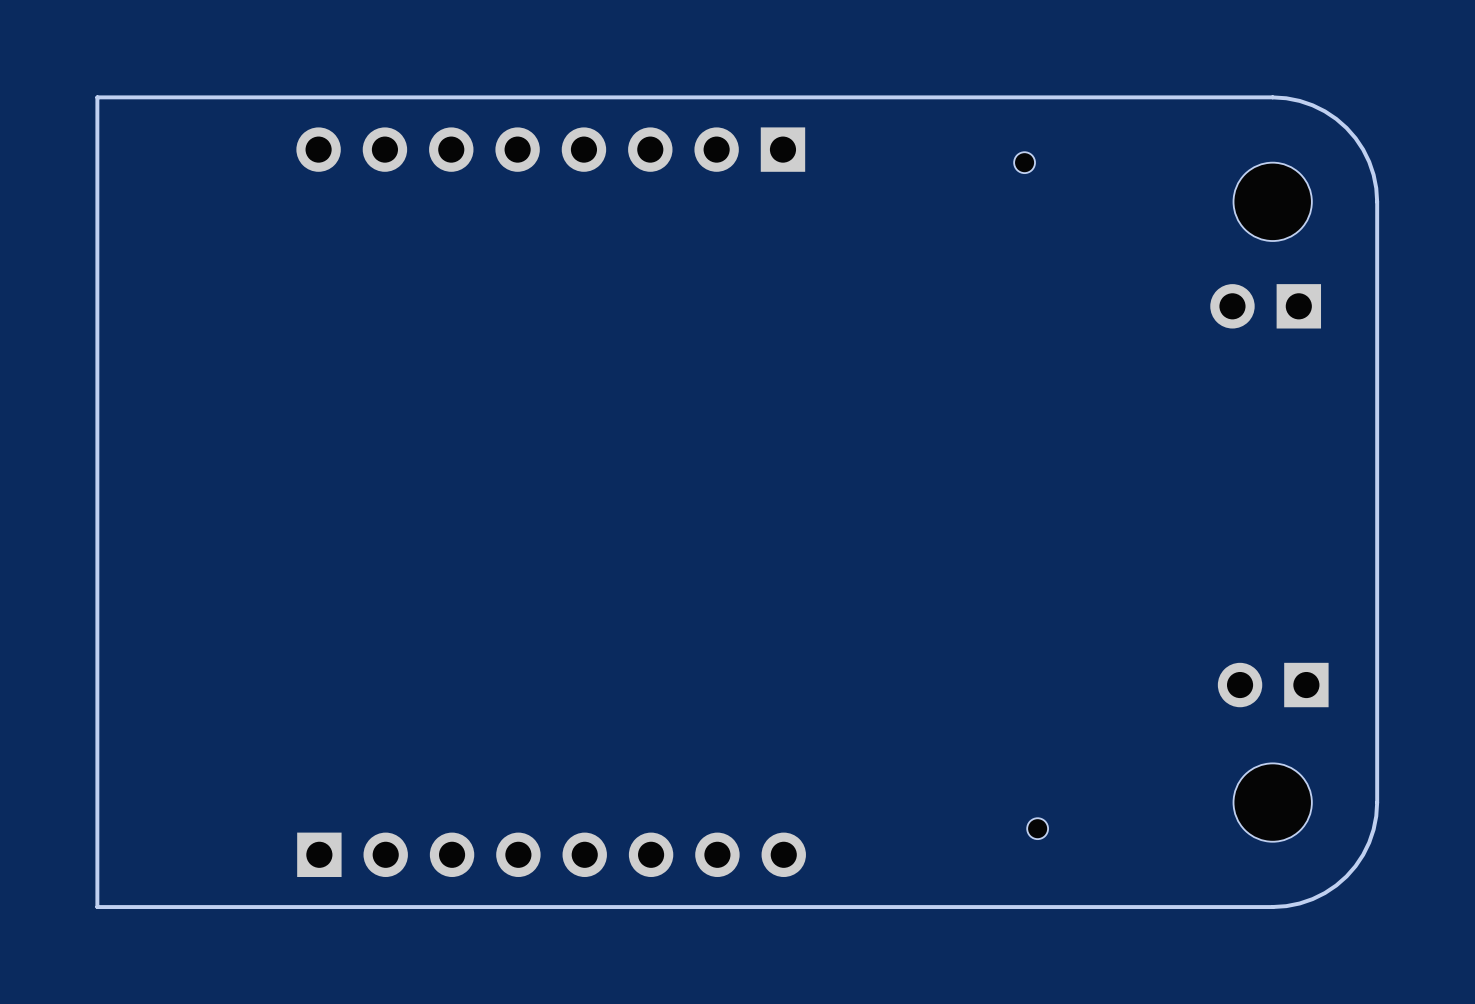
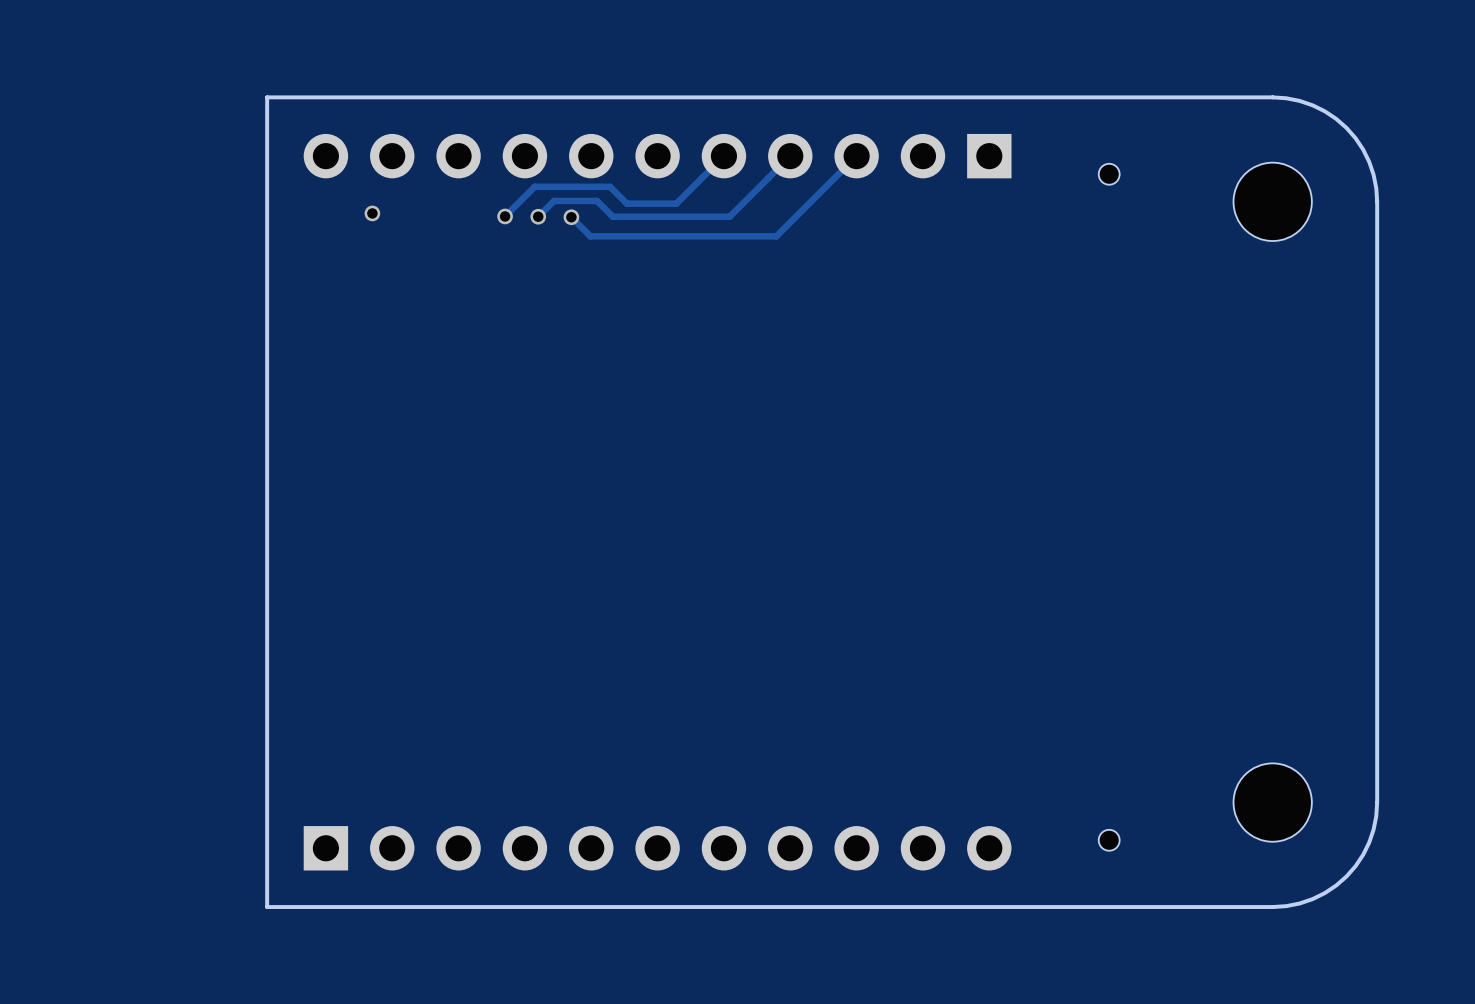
board edge: (267, 97) (97, 97) (97, 907) (267, 907) -> (267, 97) (267, 907)
part: (550, 149) -> none
part: none -> (657, 156)
track: none -> (723, 156) (676, 203) (626, 203) (610, 186) (534, 186) (505, 216)
track: none -> (790, 156) (729, 216) (612, 216) (597, 200) (554, 200) (538, 216)
track: none -> (856, 156) (776, 236) (590, 236) (571, 217)
part position: (1024, 162) -> (1109, 174)
via: none -> (372, 213)
via: none -> (505, 216)
via: none -> (538, 216)
via: none -> (571, 217)
part: (1265, 306) -> none
part: (1273, 685) -> none
part position: (1037, 828) -> (1109, 840)
part: none -> (657, 848)
part: (551, 854) -> none

